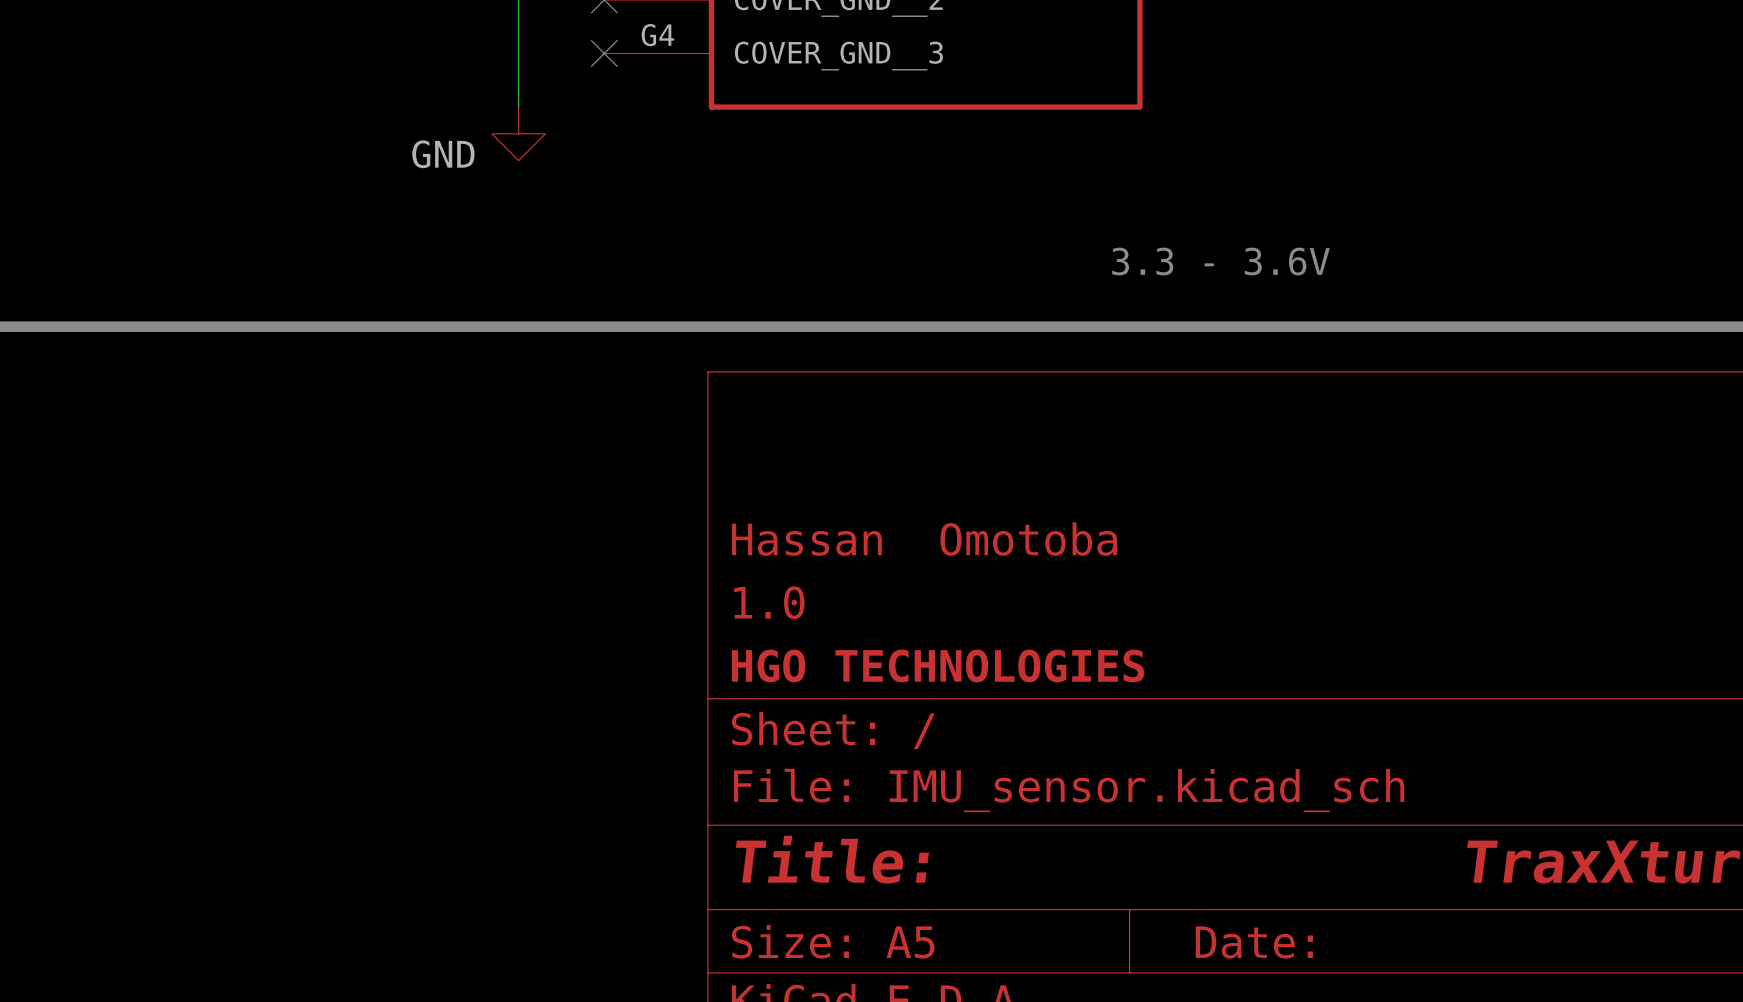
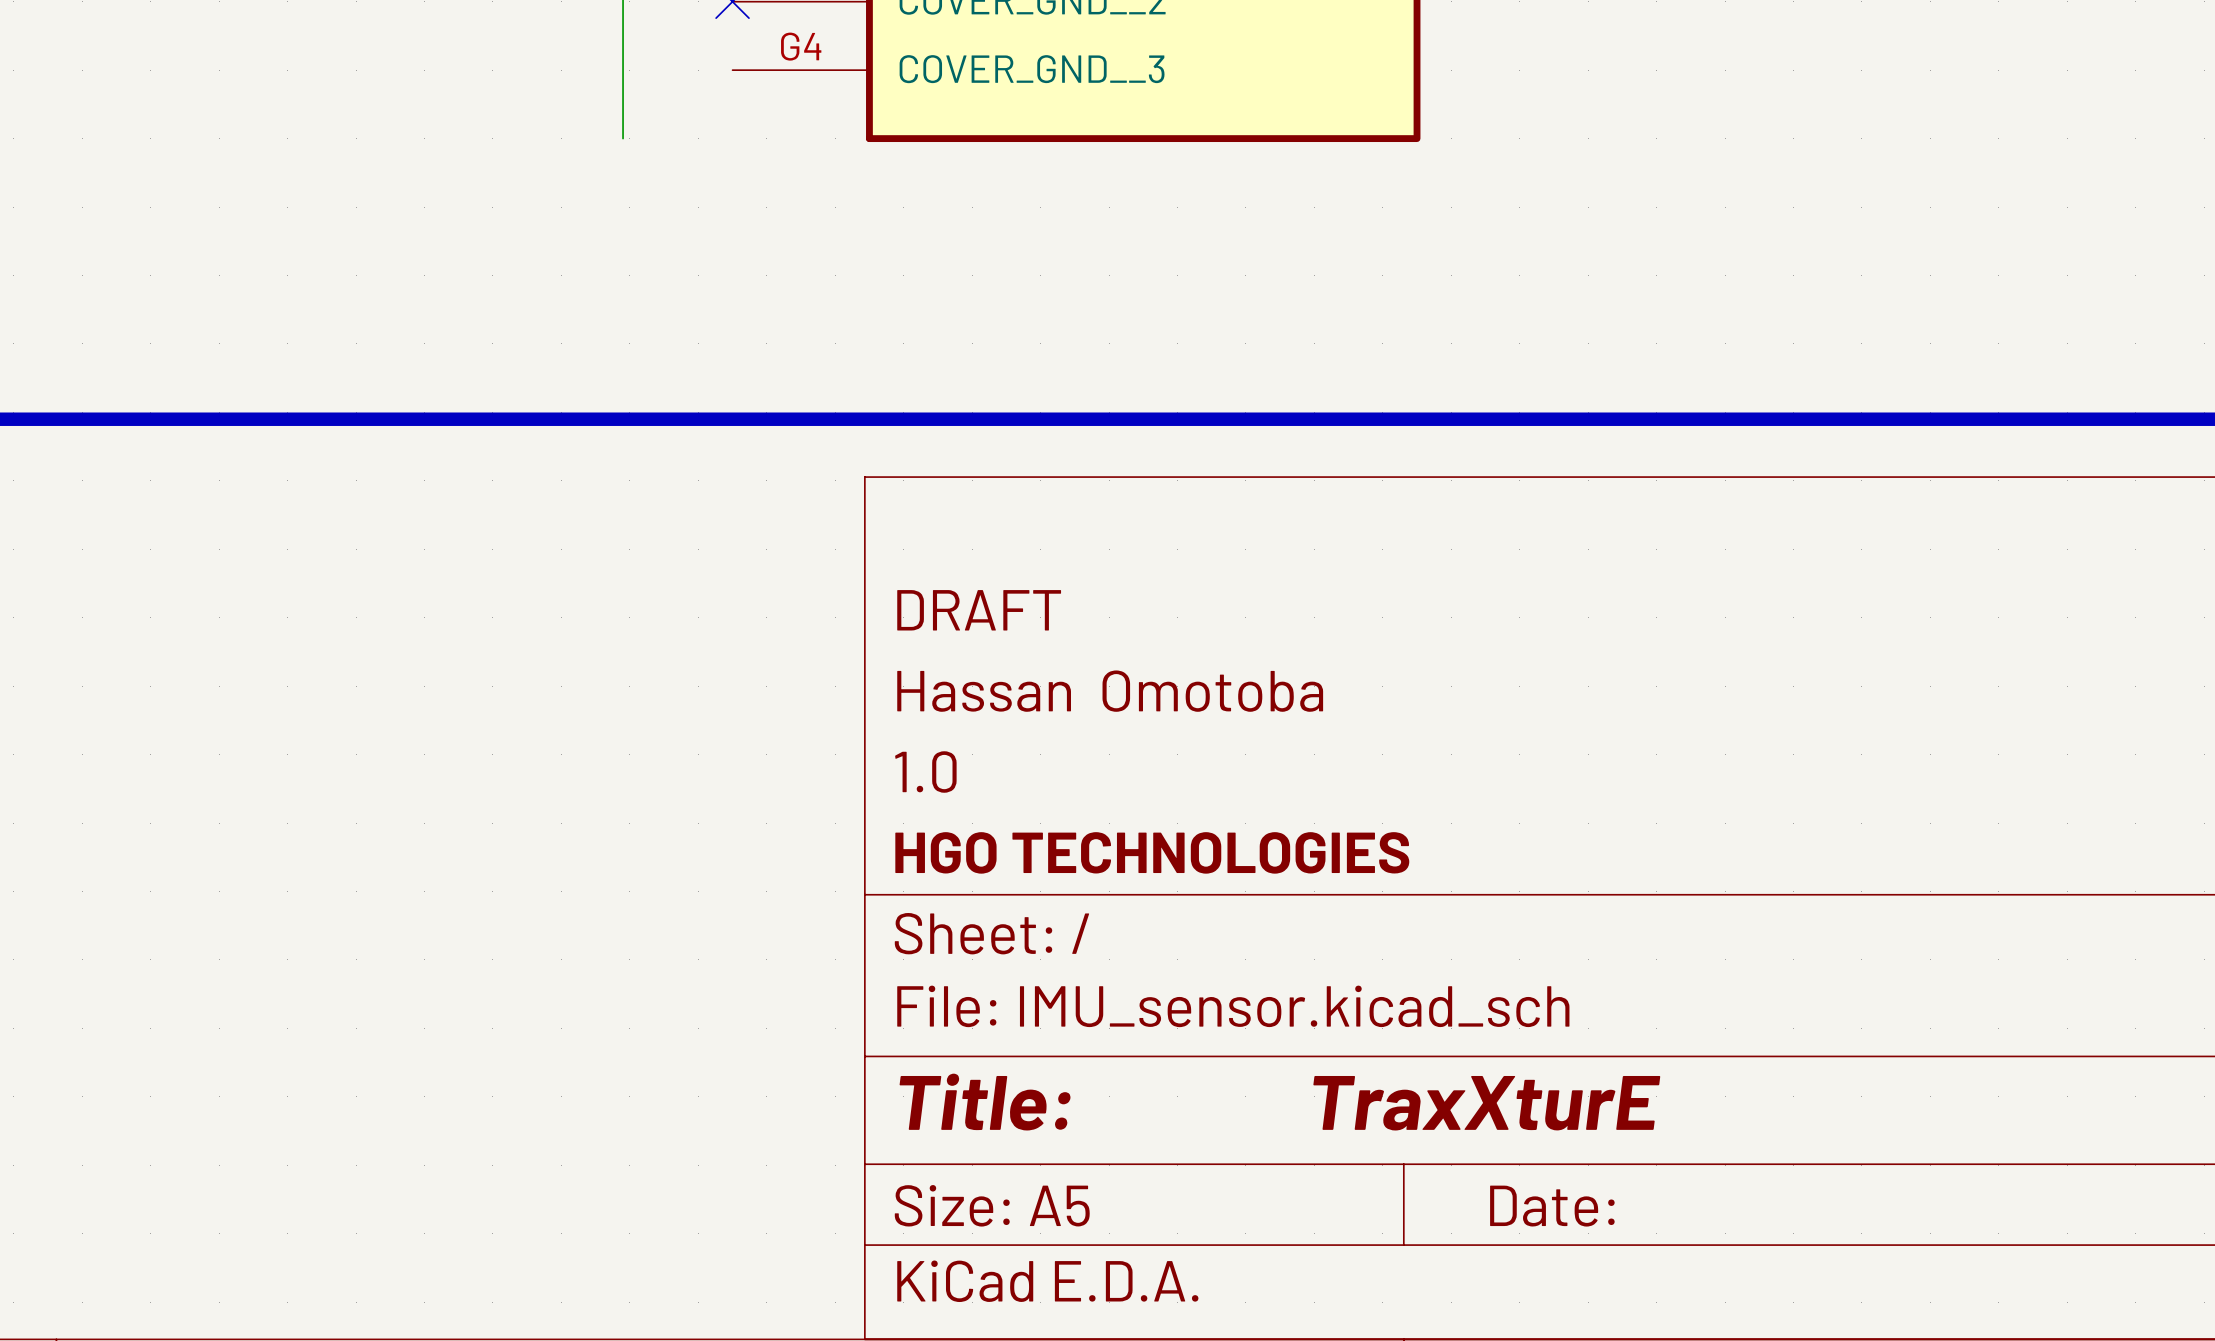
no-connect mark: (604, 53) -> none
power symbol: GND (518, 133) -> none
text: 3.3 - 3.6V (1220, 261) -> none
title block: none -> DRAFT (979, 610)

